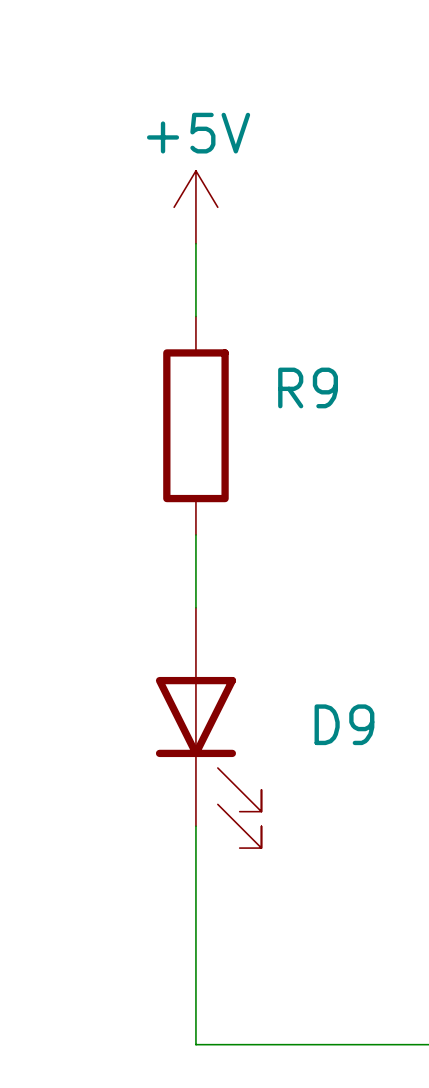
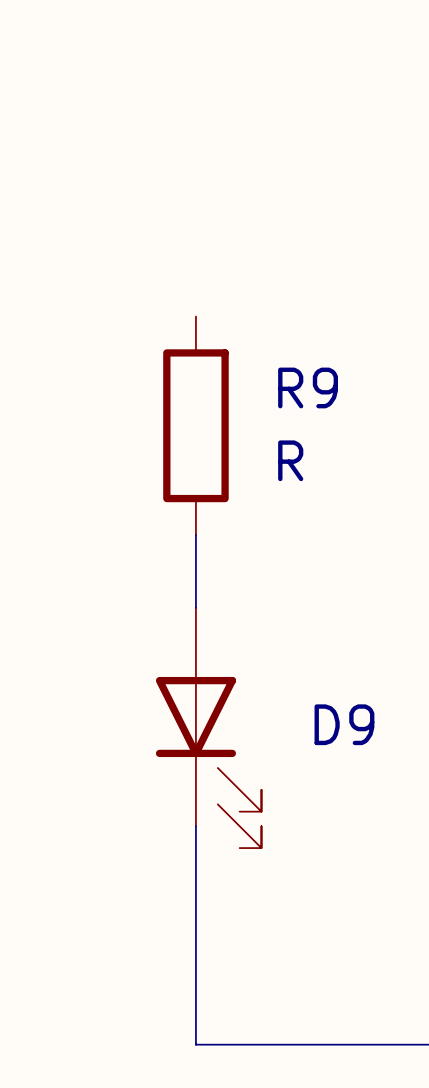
power symbol: +5V (195, 207) -> none
wire: (195, 243) (195, 316) -> none
R9 value: none -> R (290, 460)

